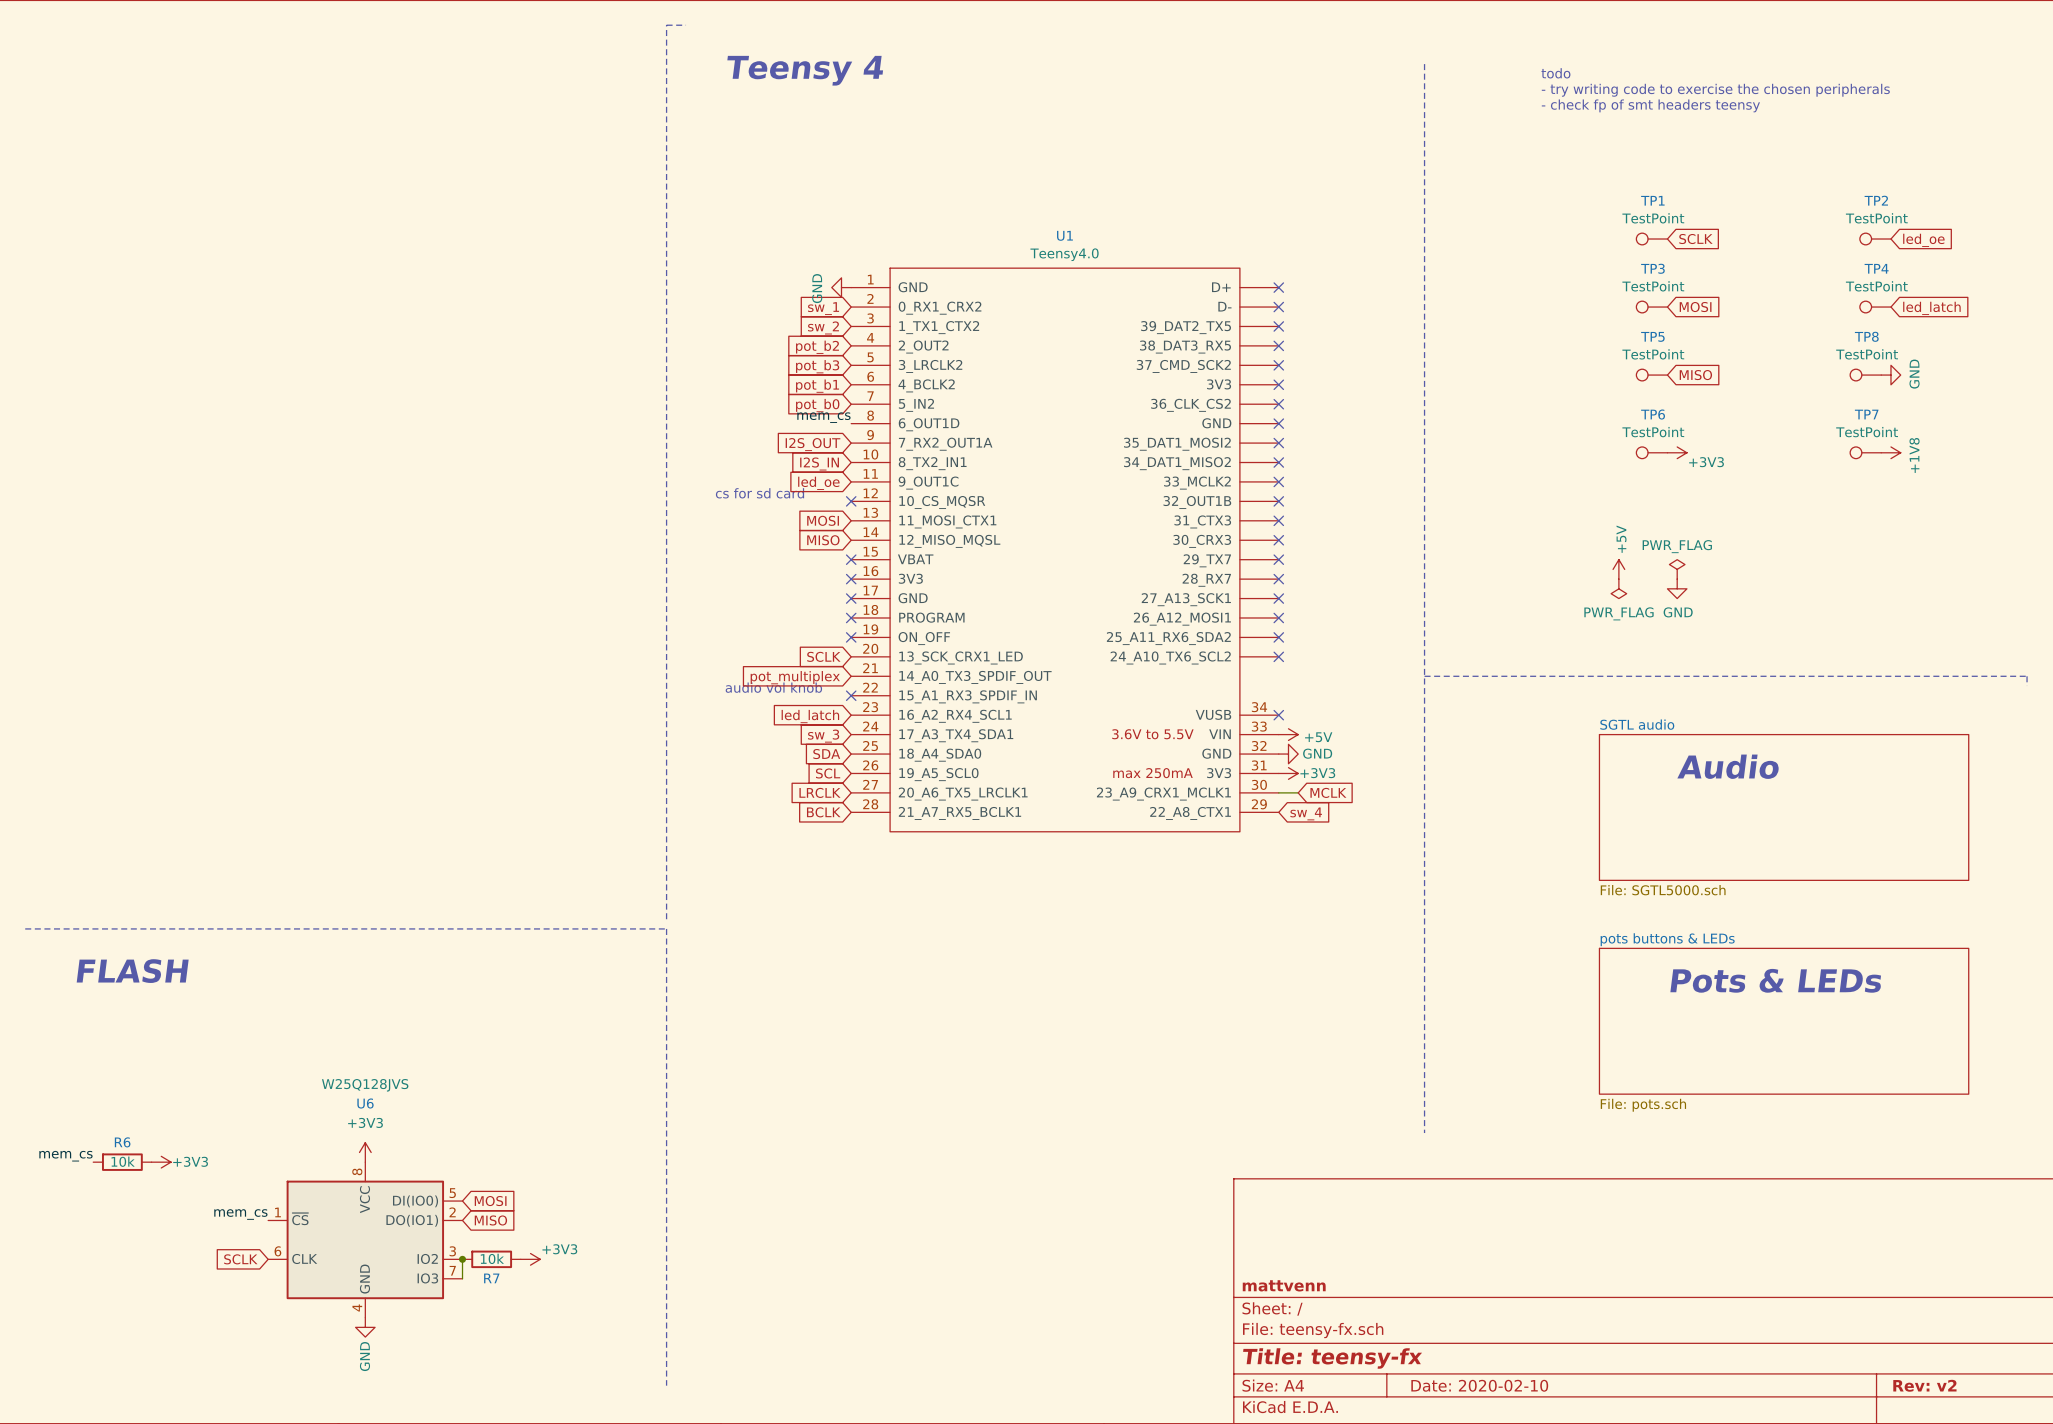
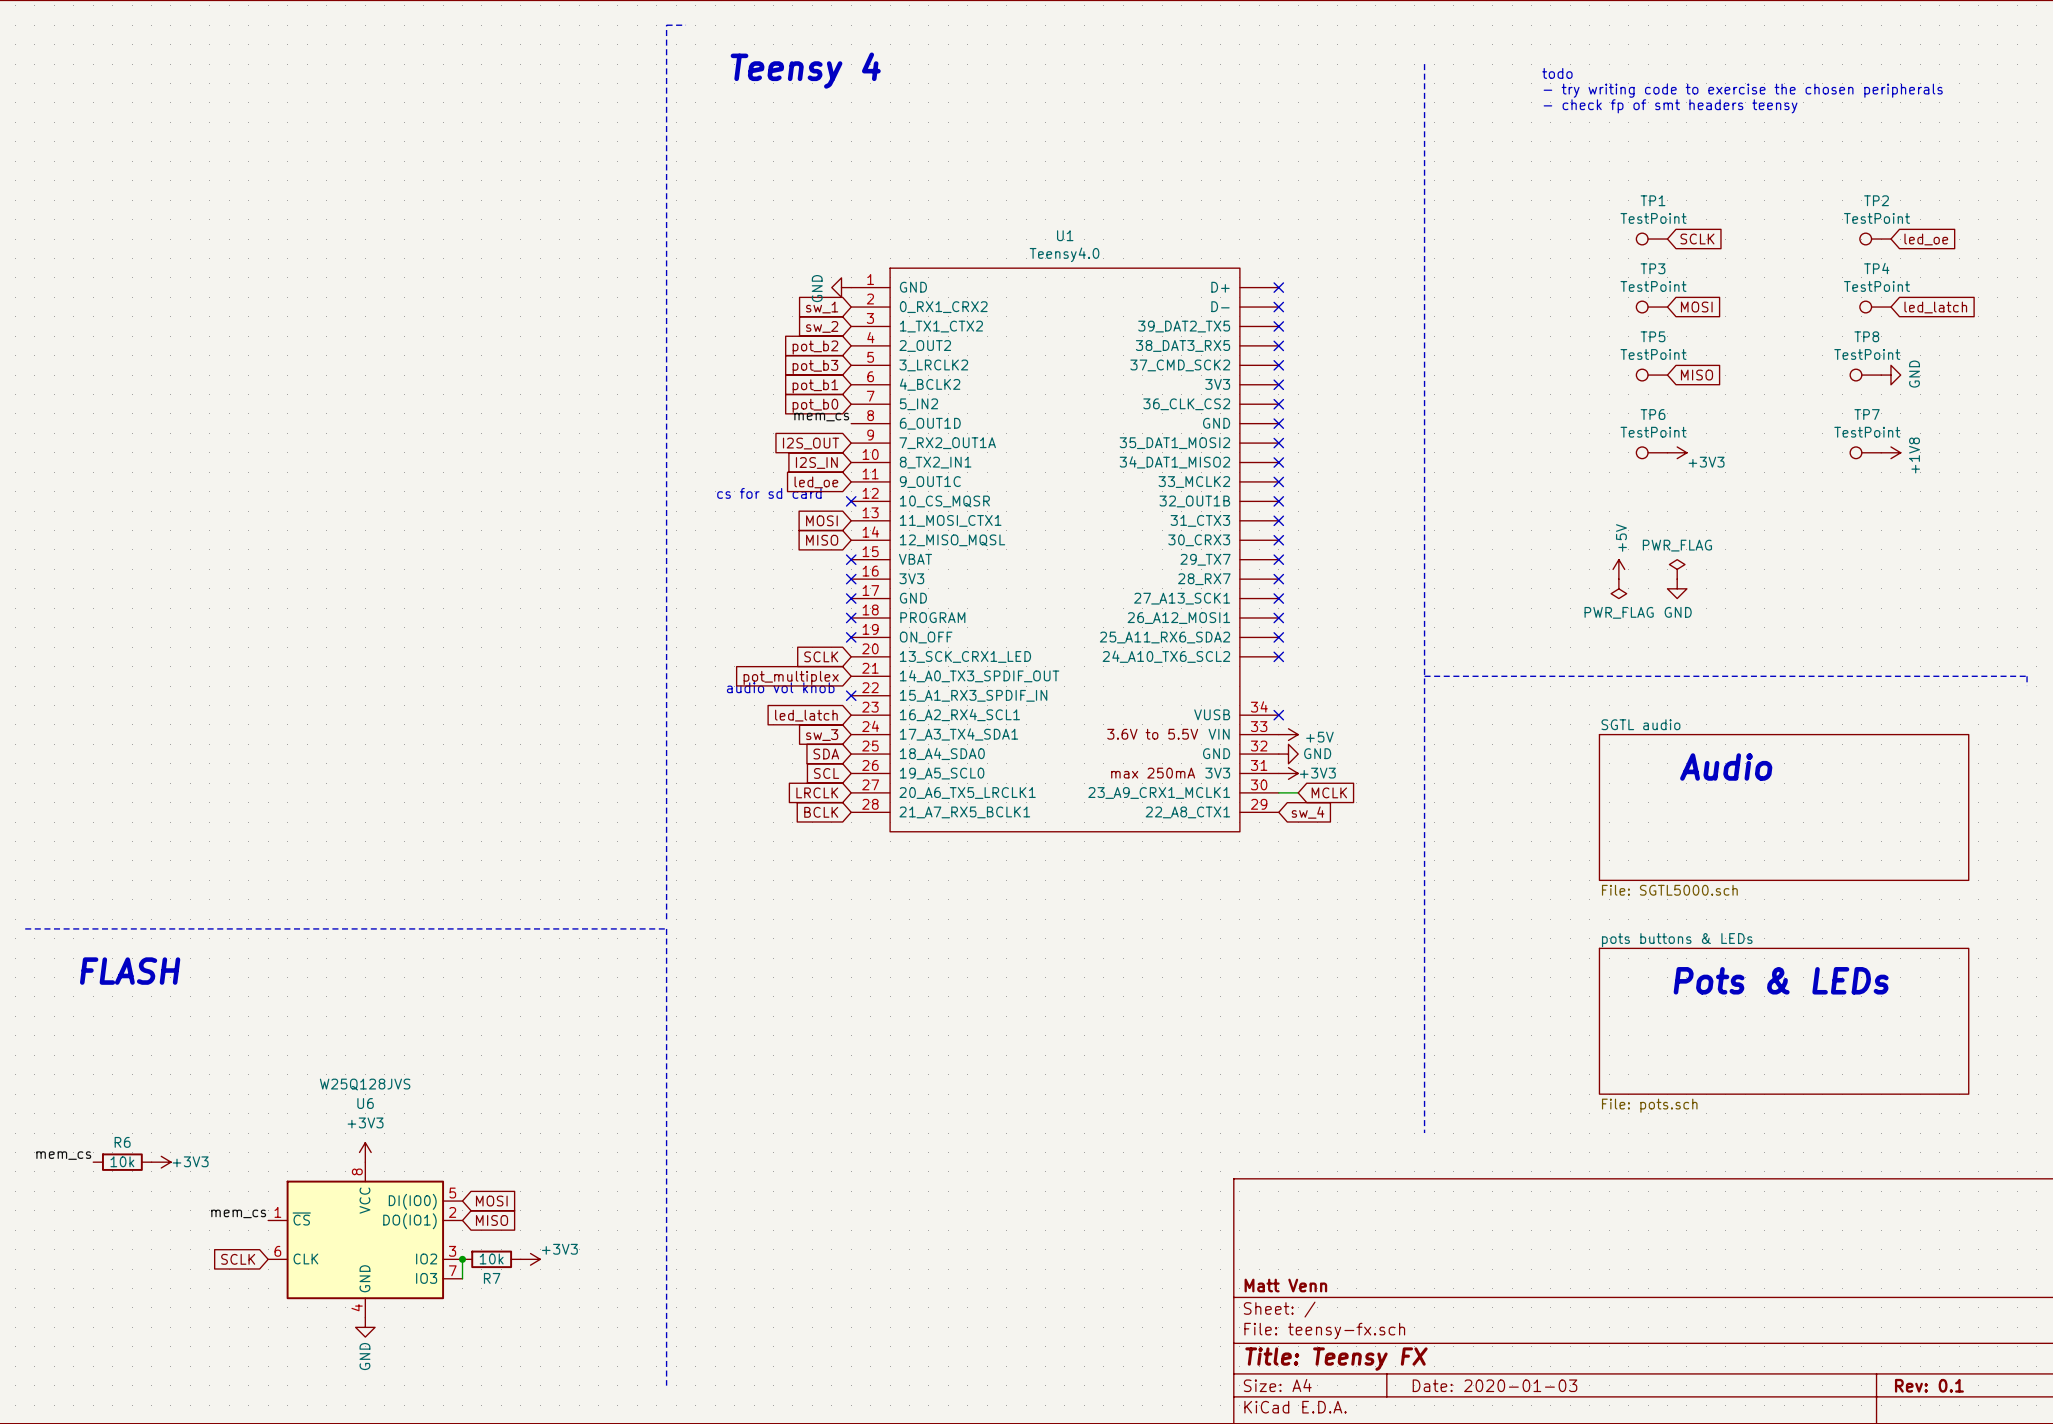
title block: mattvenn (1284, 1285) -> Matt Venn (1285, 1285)
title block: Title: teensy-fx (1332, 1358) -> Title: Teensy FX (1336, 1359)
title block: Date: 2020-02-10 (1479, 1385) -> Date: 2020-01-03 (1495, 1385)
title block: Rev: v2 (1924, 1385) -> Rev: 0.1 (1929, 1385)

